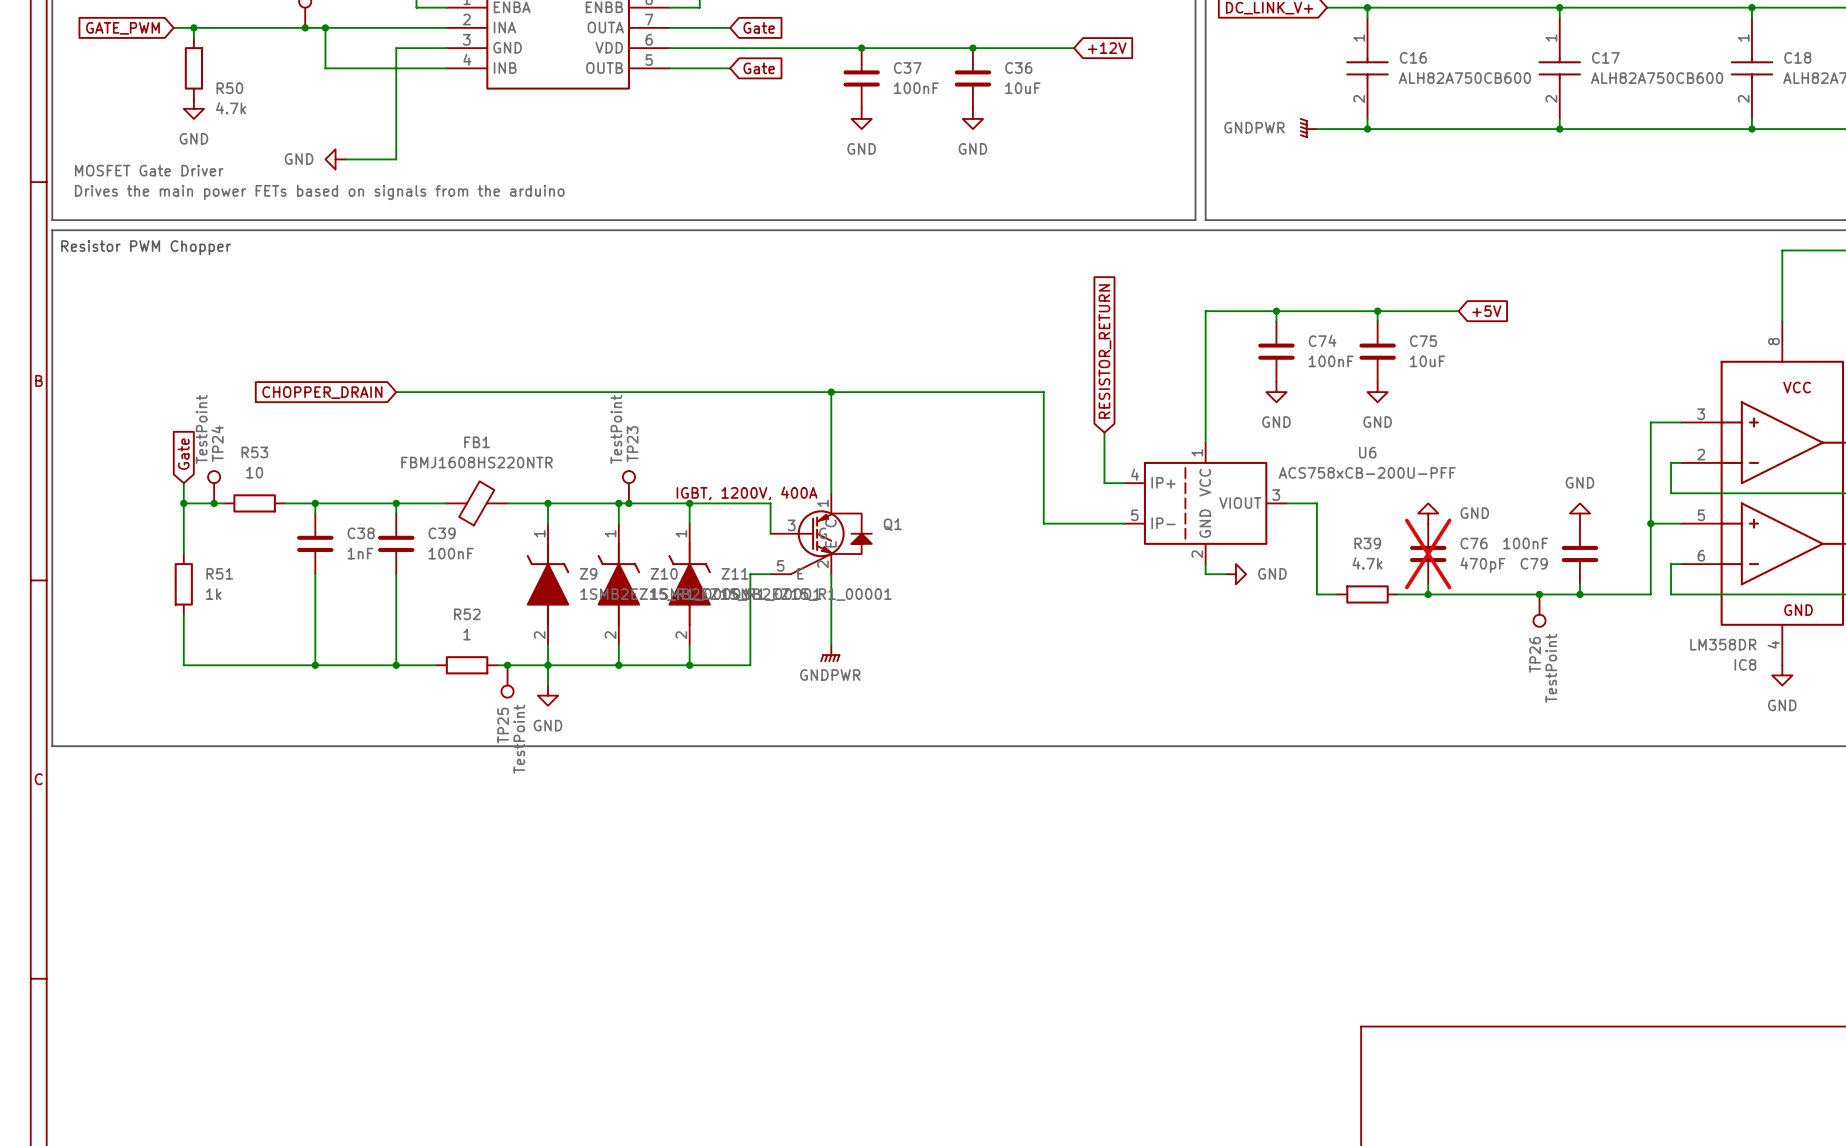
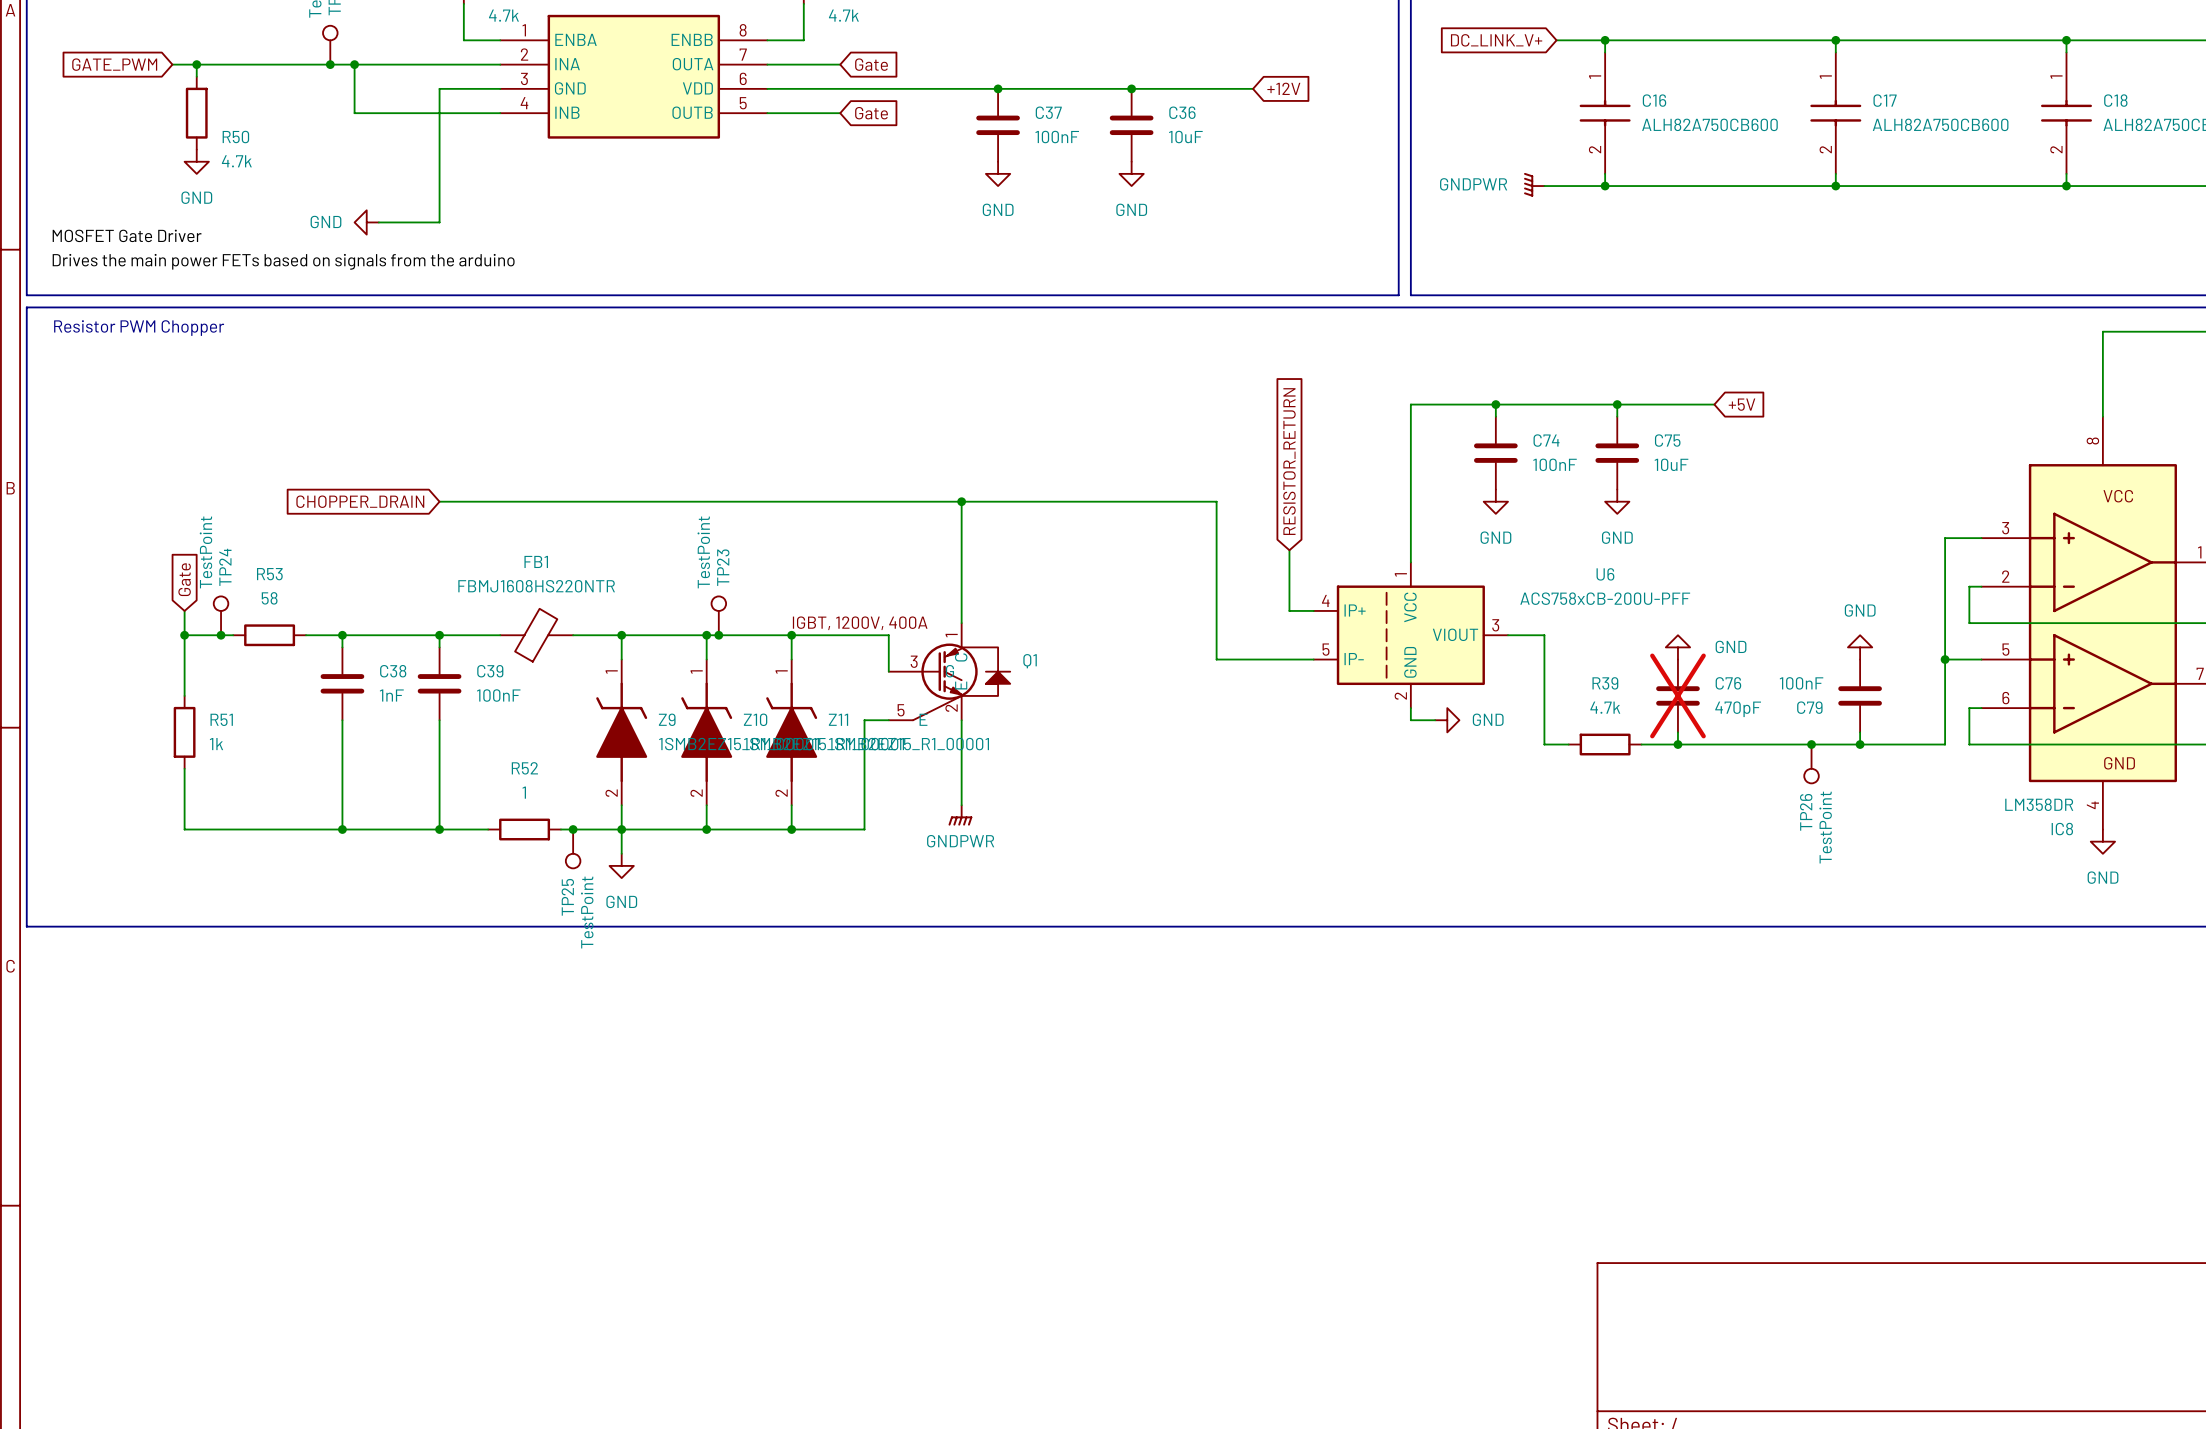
R53 value: 10 (254, 472) -> 58 (269, 598)

